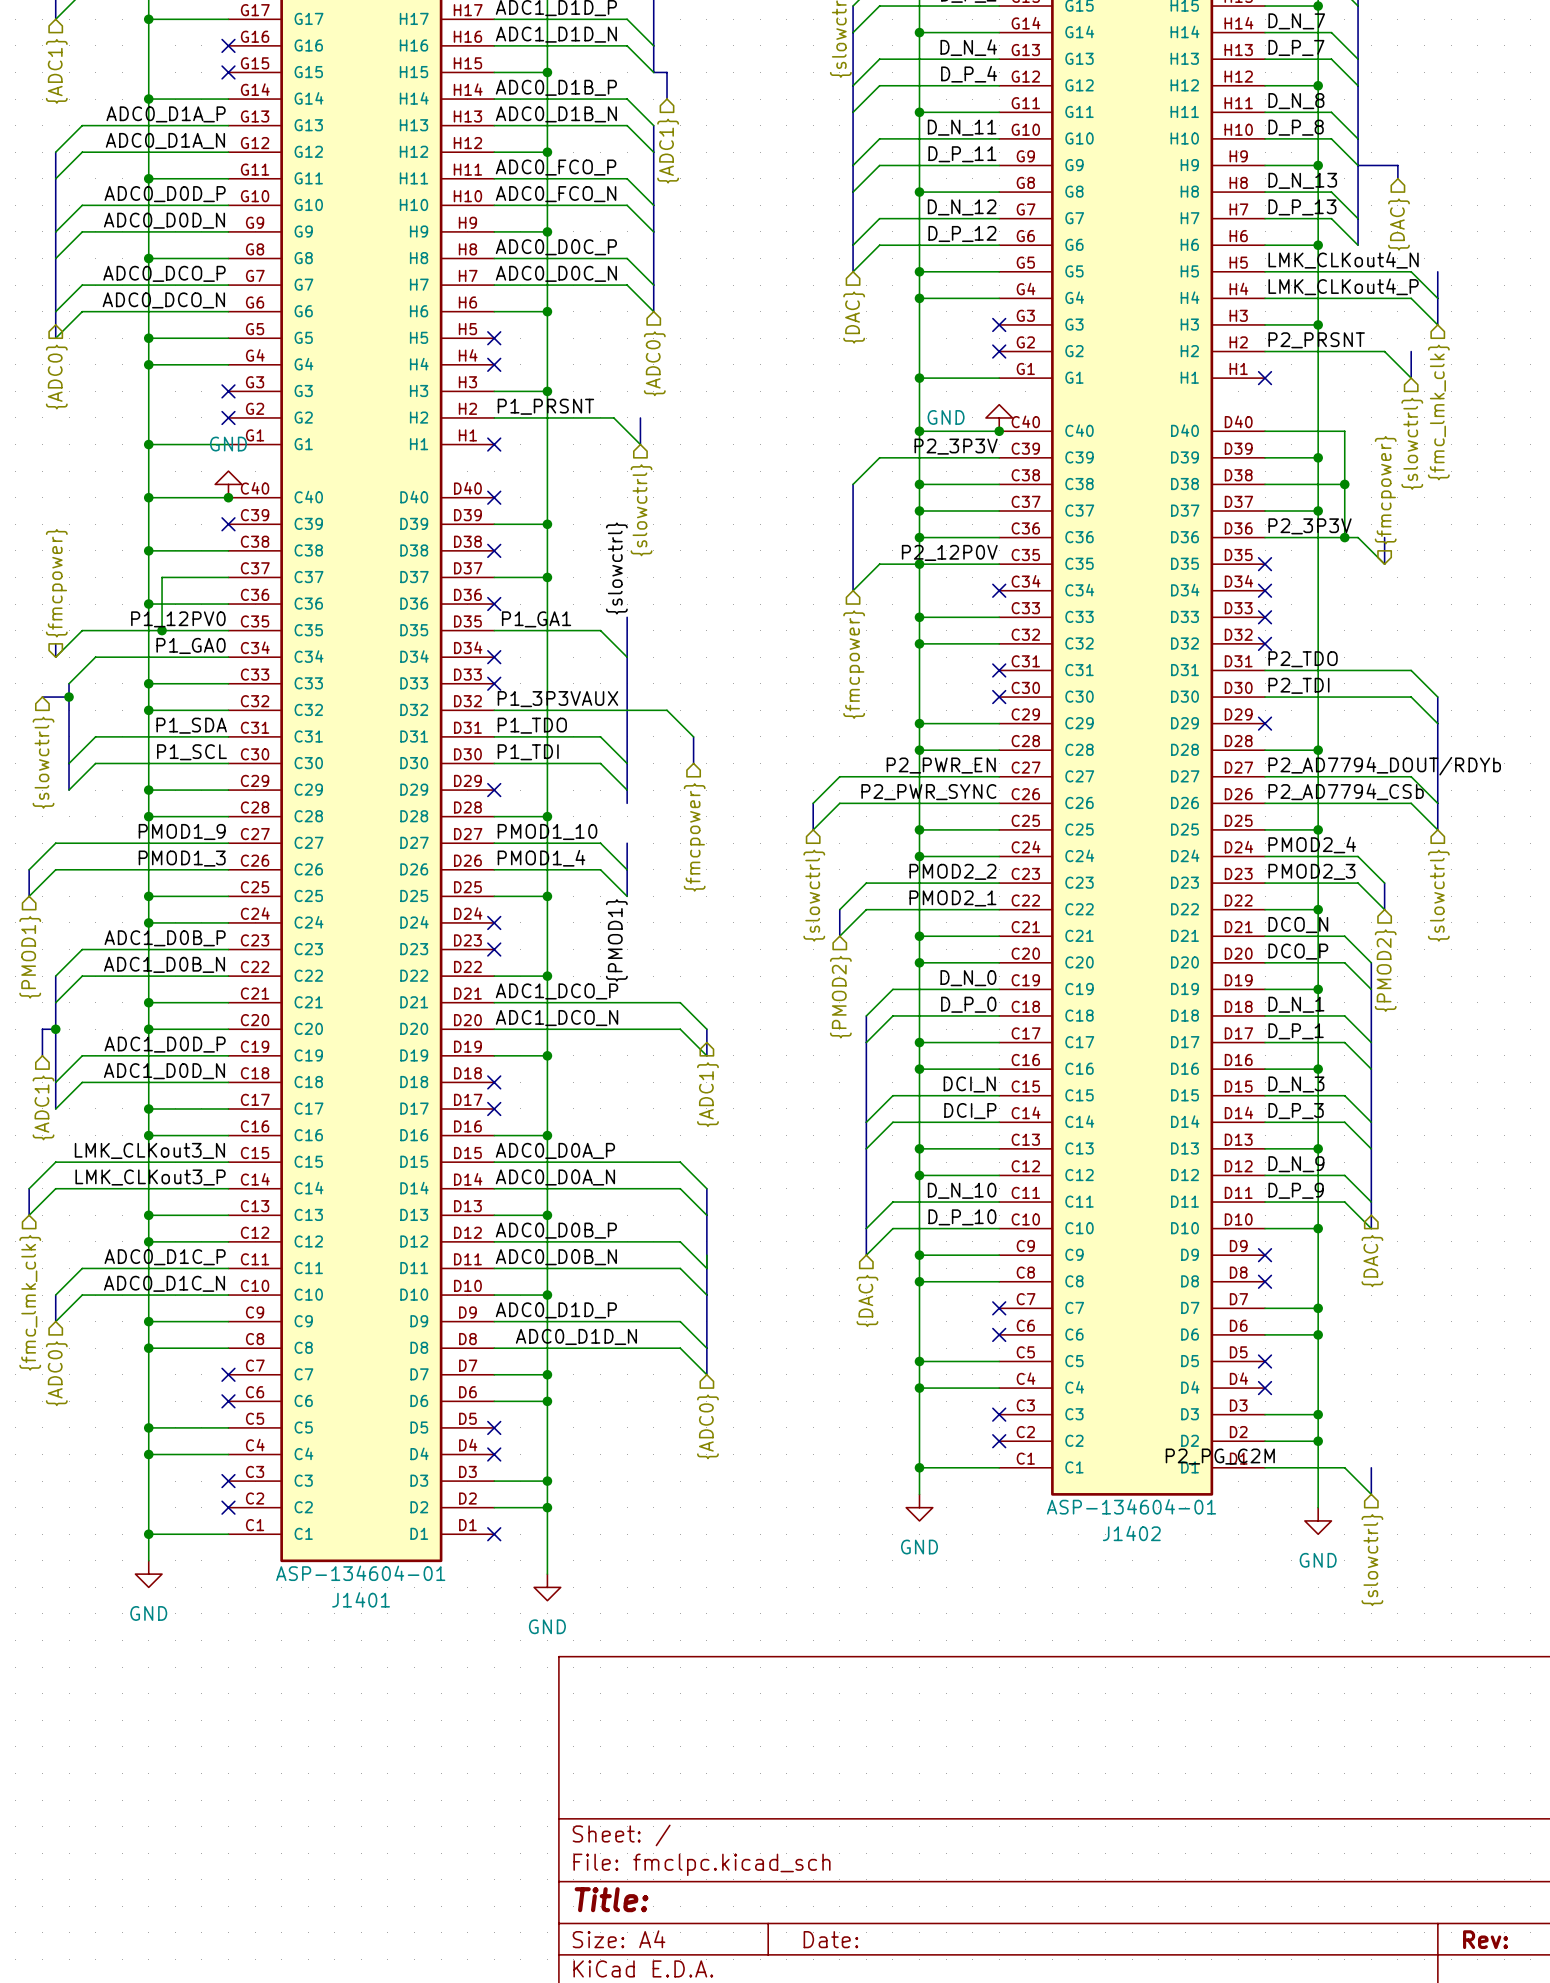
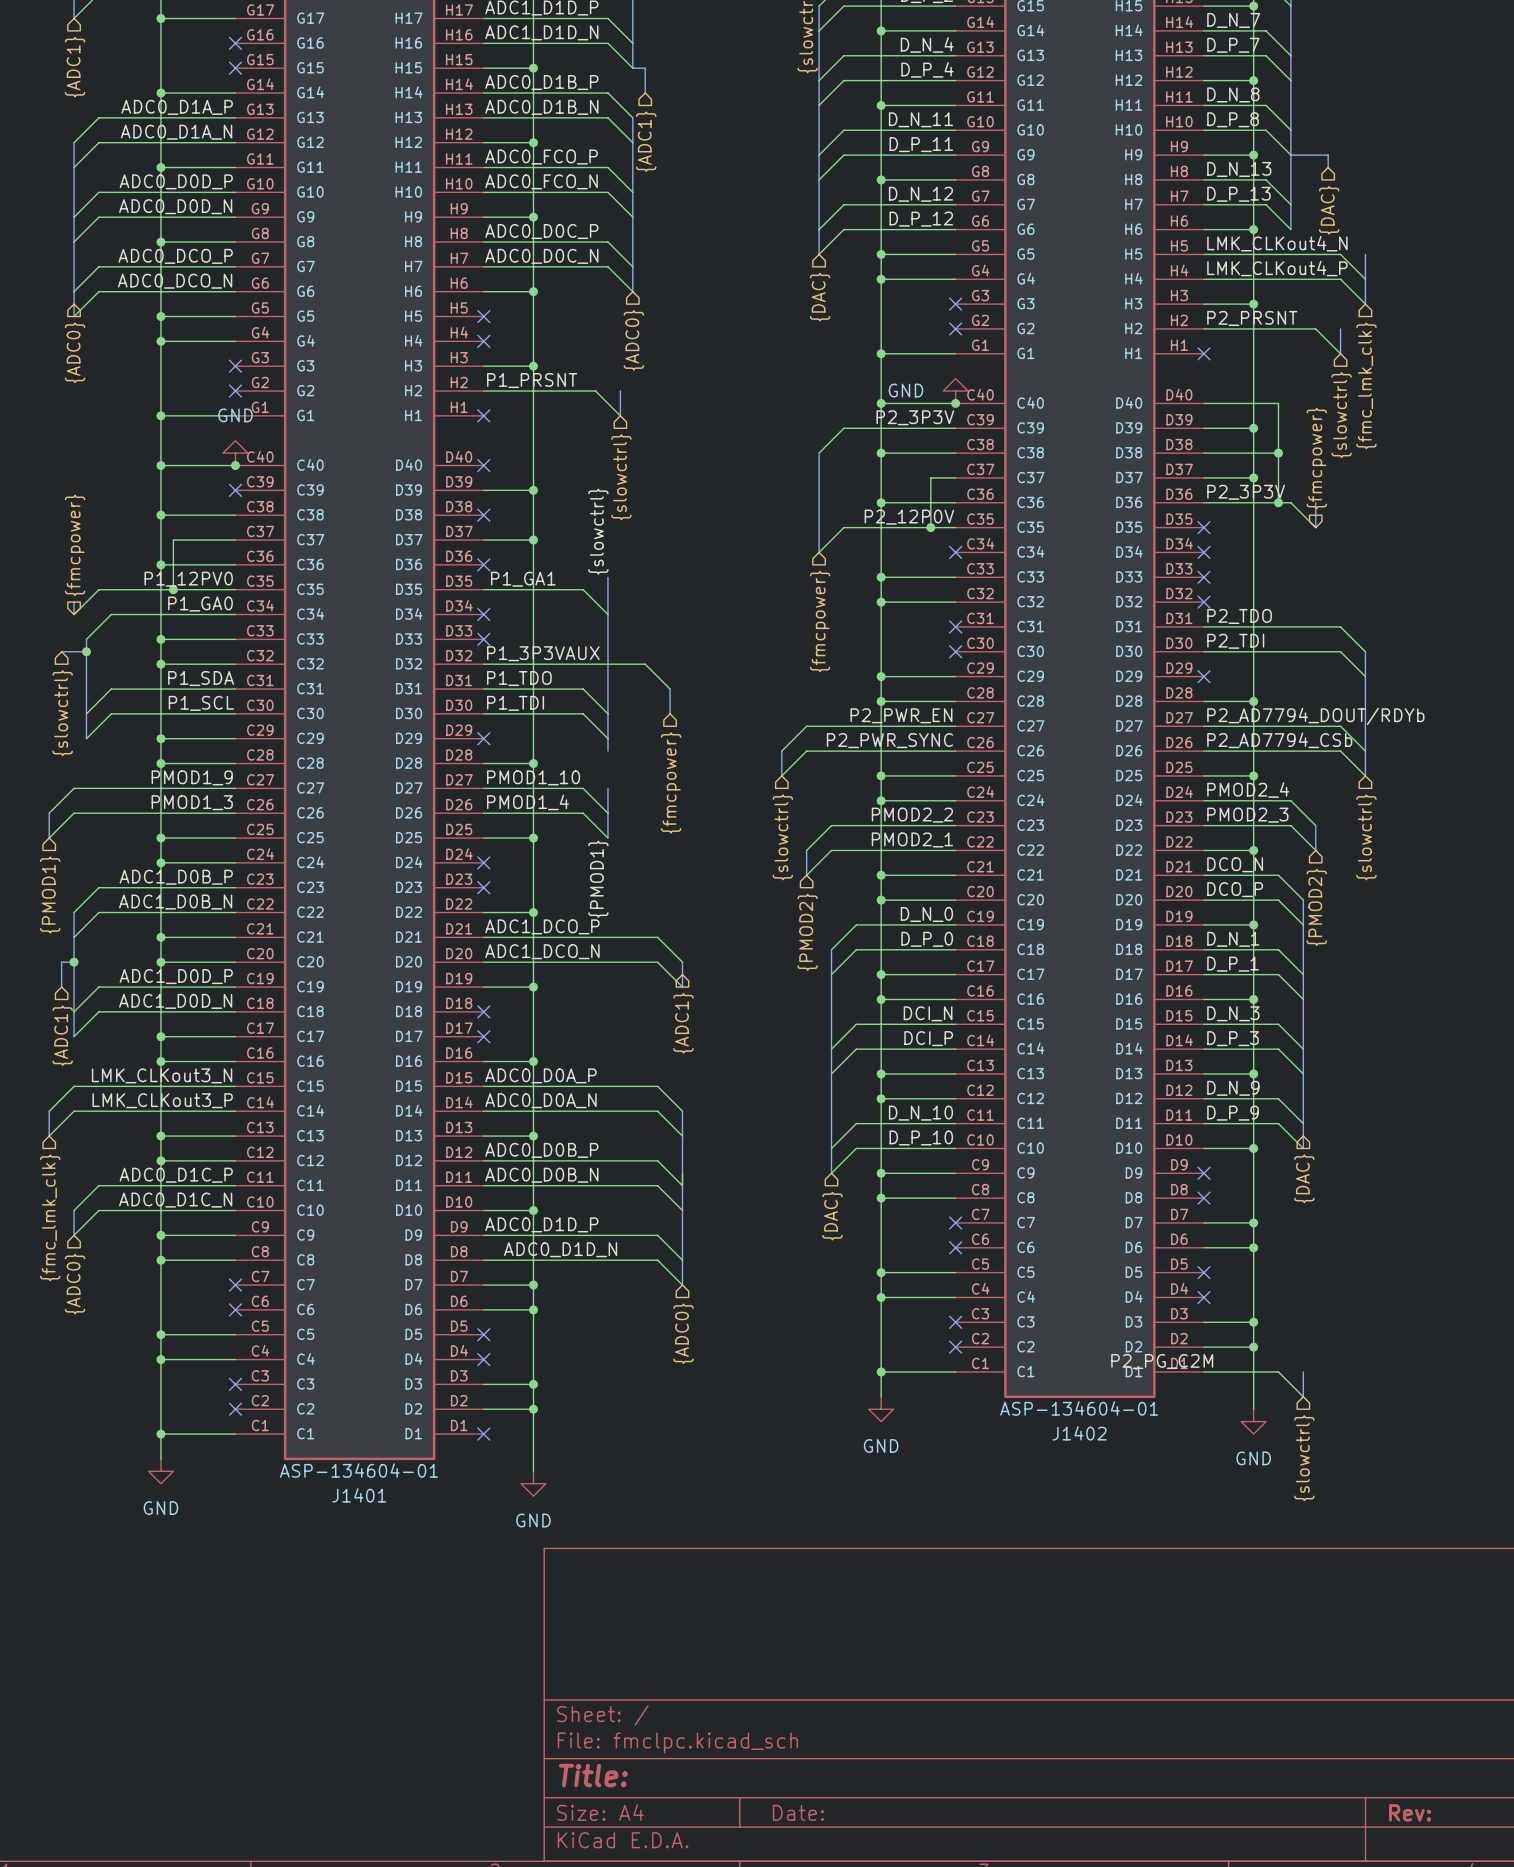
wire: (919, 510) (972, 510) -> (930, 527) (930, 477)
junction: (919, 510) -> none
junction: (919, 564) -> none
junction: none -> (930, 527)

